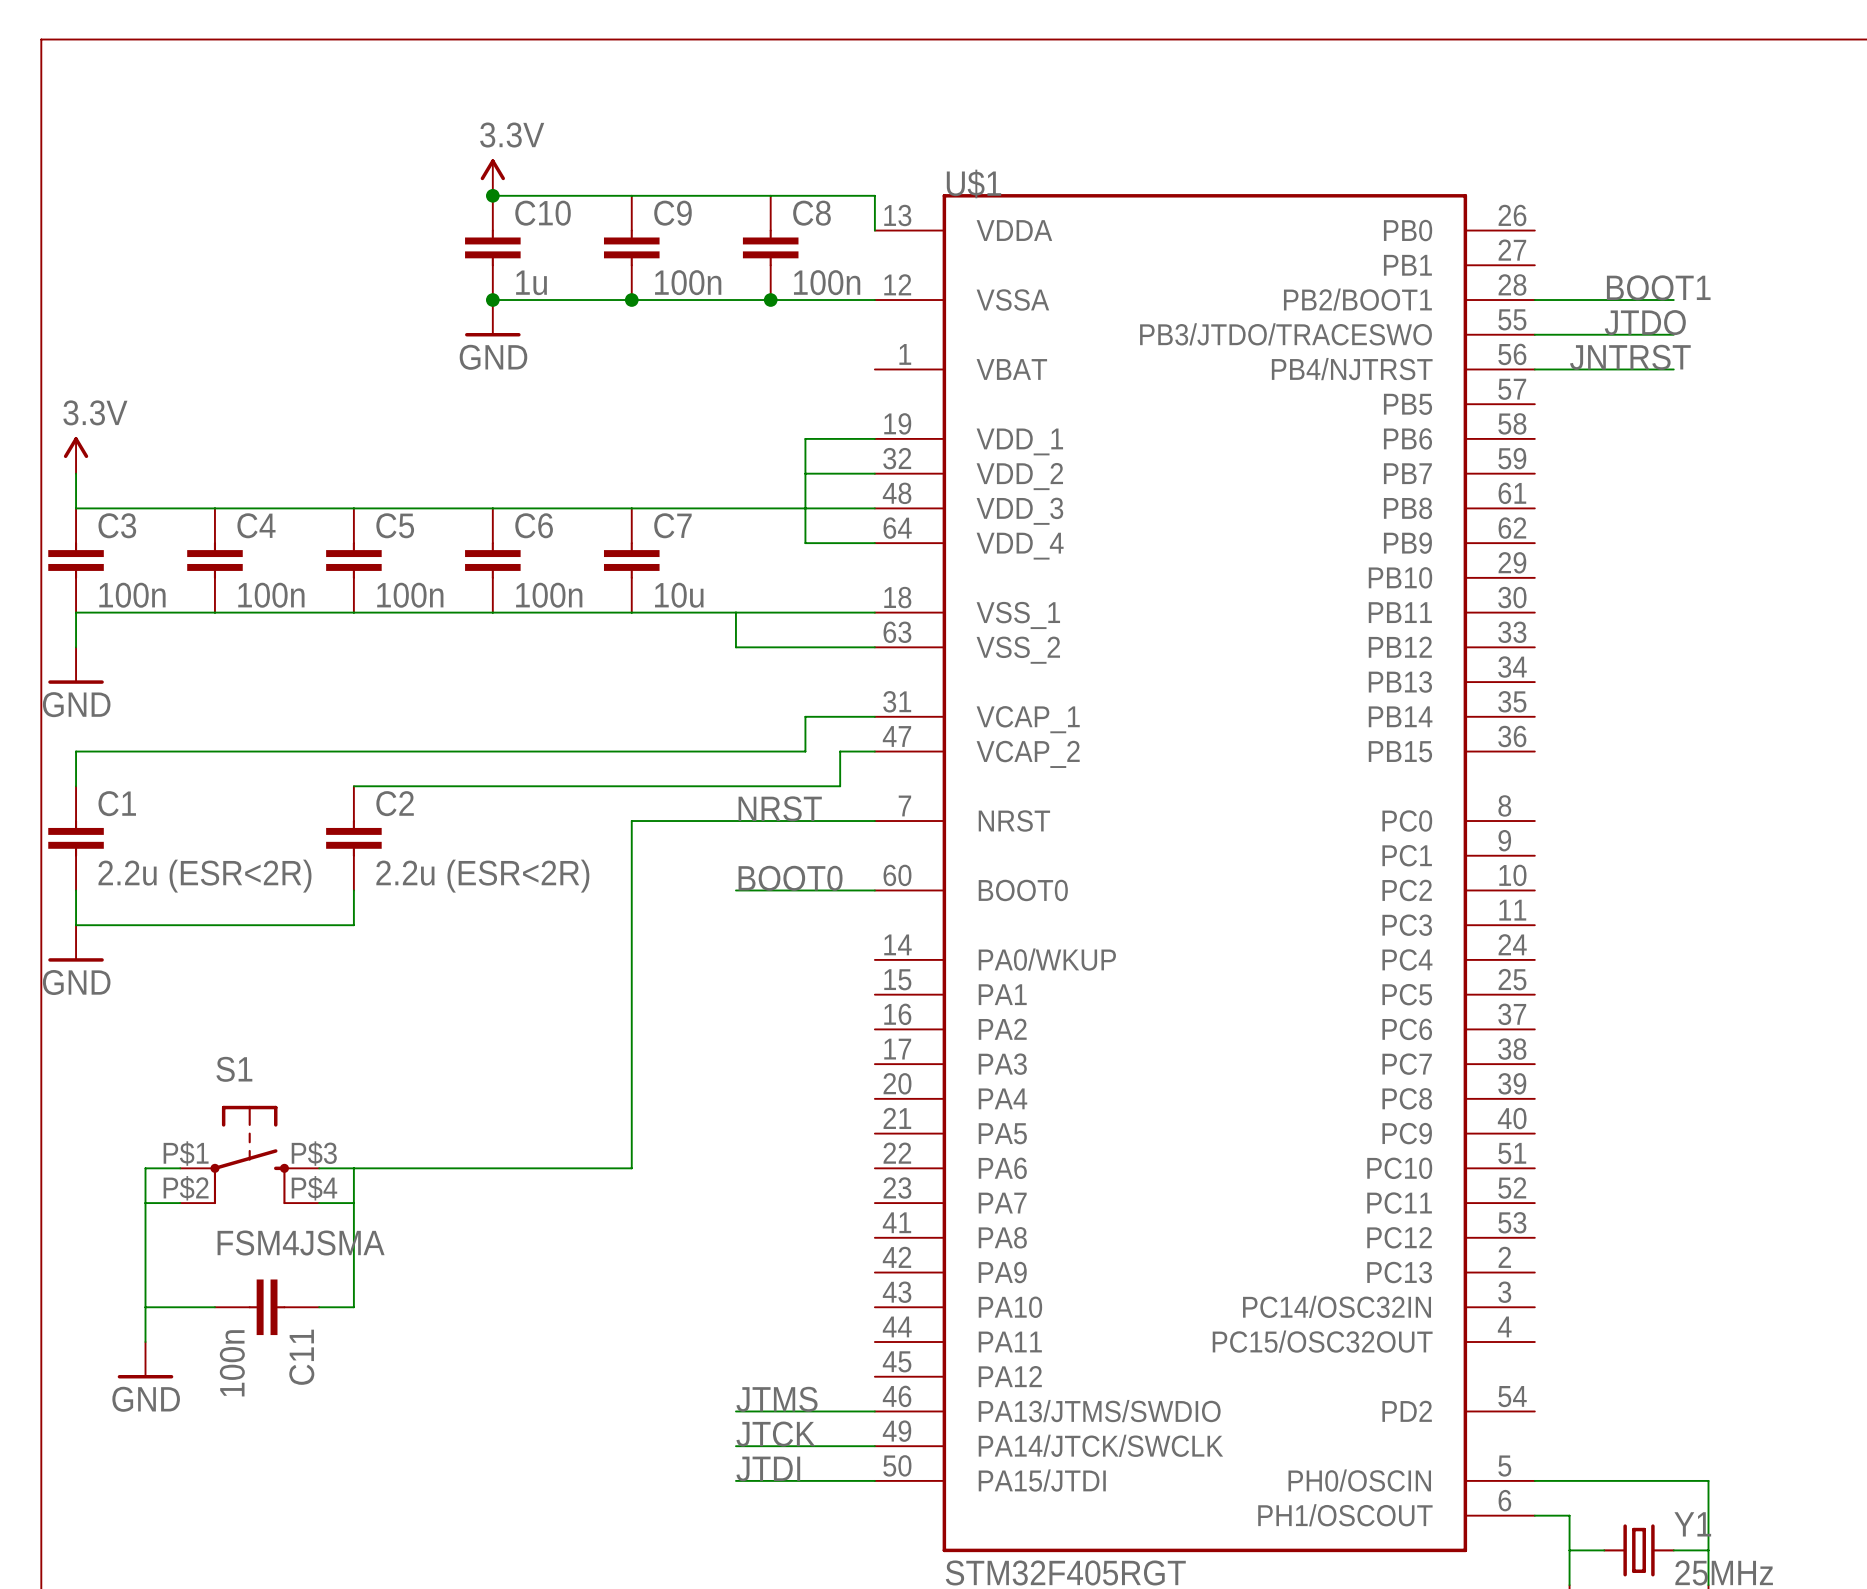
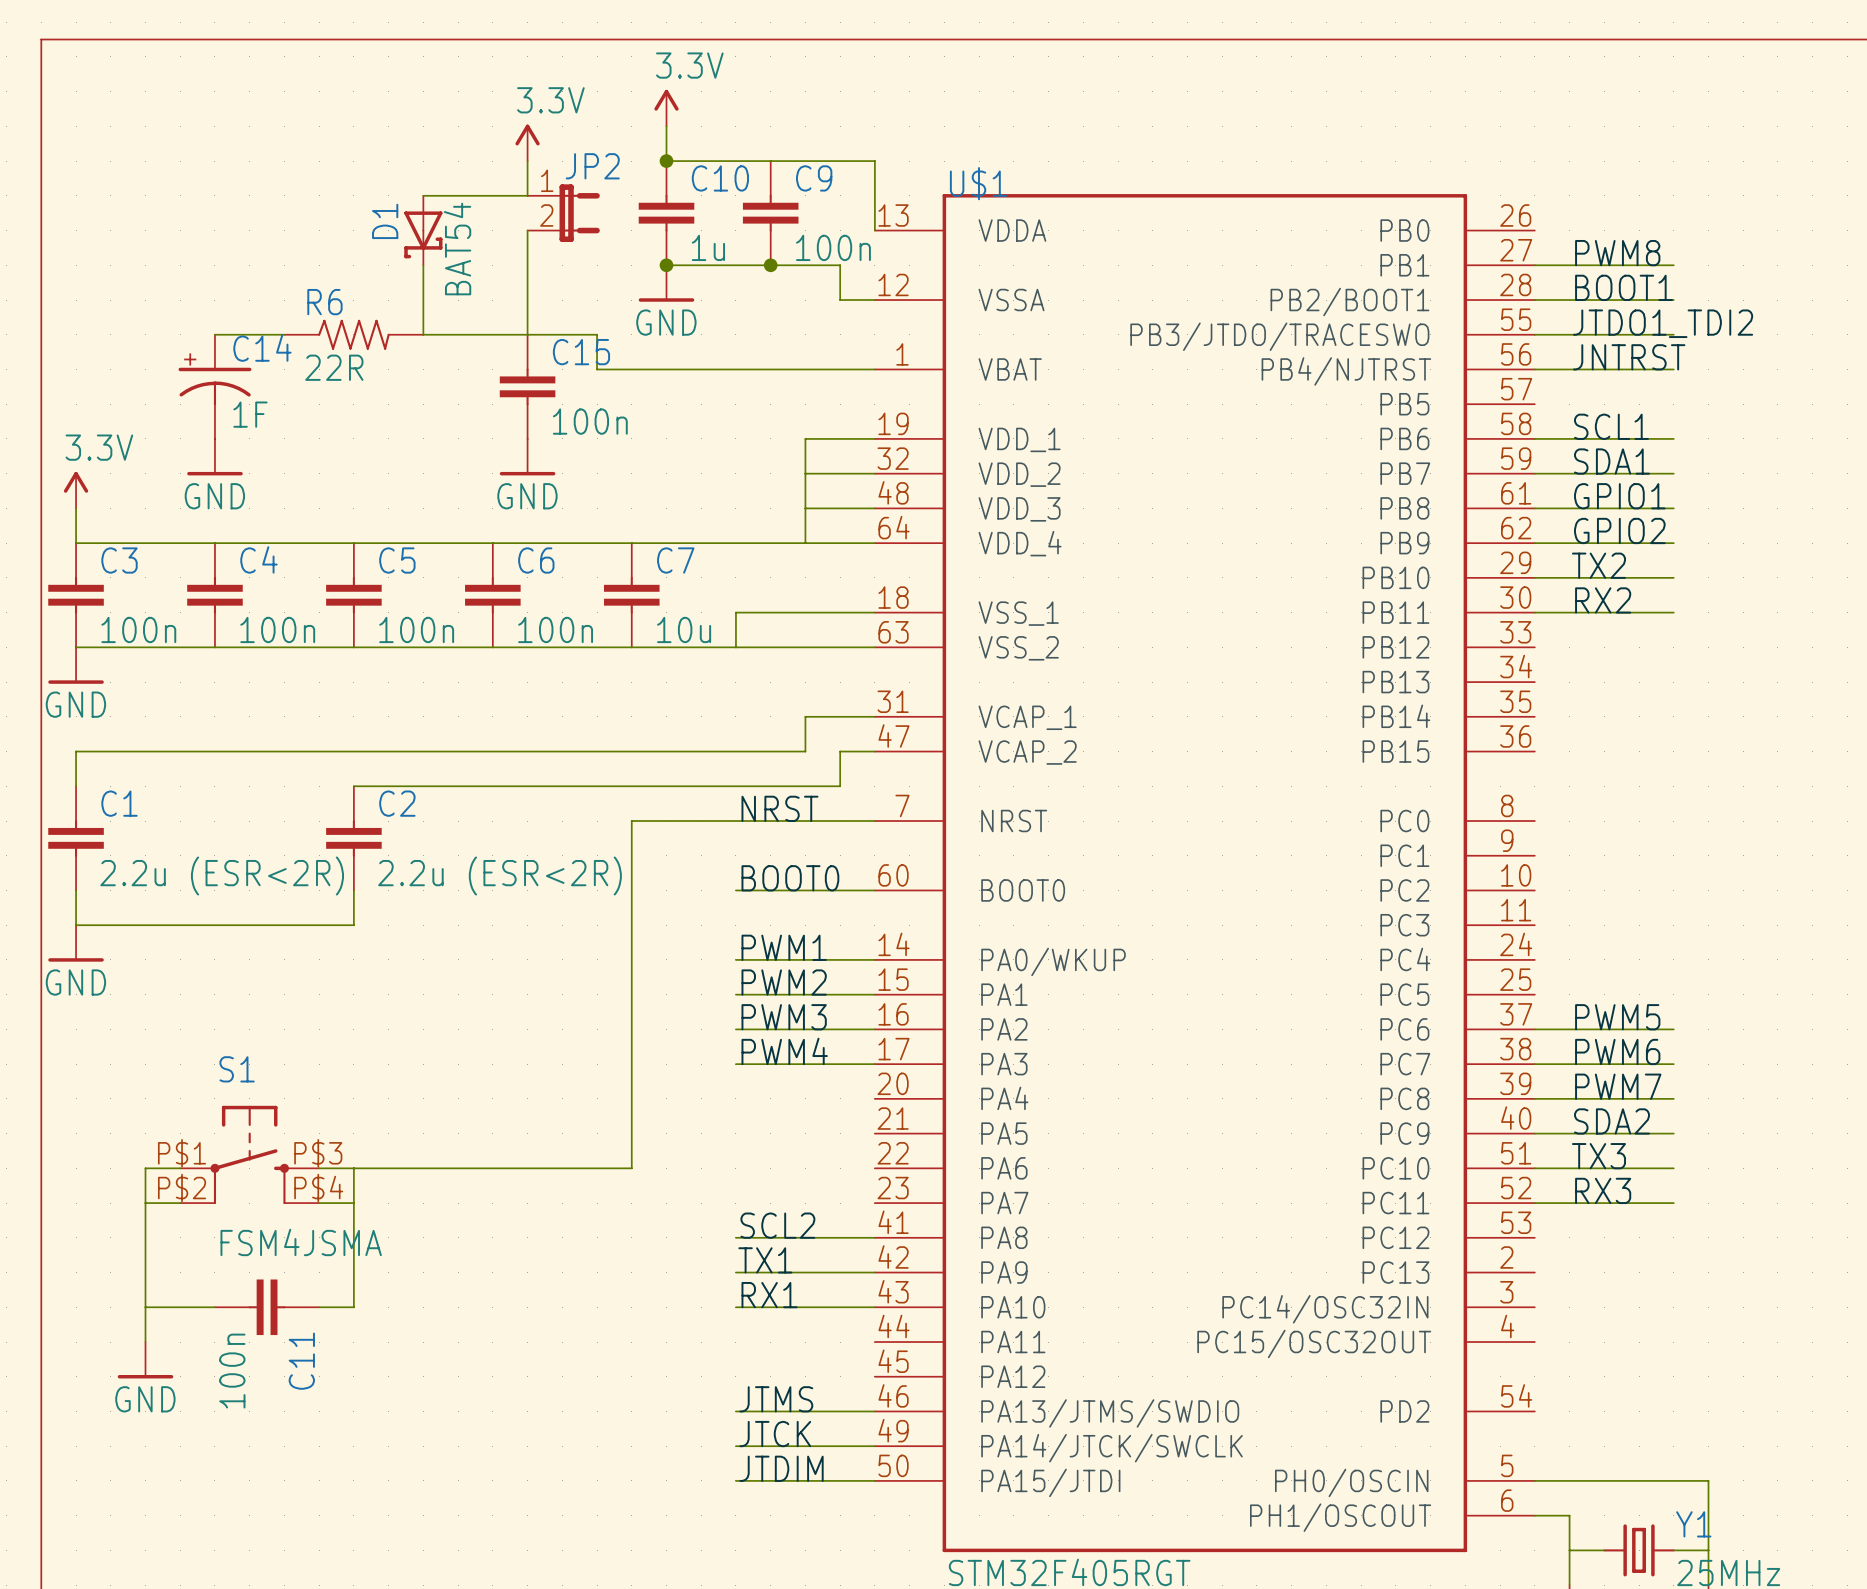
power symbol: none -> 3.3V (666, 108)
wire: none -> (527, 161) (527, 195)
junction: none -> (666, 161)
power symbol position: 3.3V (492, 177) -> 3.3V (527, 142)
wire: none -> (423, 195) (492, 195)
junction: (492, 195) -> none
wire: (527, 195) (874, 195) -> (666, 126) (666, 161) (874, 161) (874, 195)
JP2: none -> (563, 213)
D1: none -> BAT54 (423, 230)
wire: none -> (527, 230) (527, 334)
C10 position: (492, 247) -> (666, 213)
C9 position: (631, 247) -> (770, 213)
C8: 100n (770, 247) -> none
label: none -> PWM8 (1617, 253)
wire: none -> (423, 265) (423, 334) (597, 334) (597, 369) (874, 369)
wire: none -> (1534, 265) (1673, 265)
power symbol: none -> GND (666, 283)
label position: BOOT1 (1658, 287) -> BOOT1 (1623, 287)
wire: (492, 300) (840, 300) -> (666, 265) (840, 265) (840, 300)
junction: (492, 300) -> none
junction position: (631, 300) -> (666, 265)
junction position: (770, 300) -> (770, 265)
power symbol: GND (492, 318) -> none
label: JTDO (1645, 322) -> none
label: none -> JTDO1_TDI2 (1663, 323)
wire: none -> (214, 334) (284, 334)
R6: none -> 22R (353, 334)
C14: none -> 1F (214, 386)
C15: none -> 100n (527, 386)
label: none -> SCL1 (1611, 426)
wire: none -> (1534, 438) (1673, 438)
power symbol position: 3.3V (76, 455) -> 3.3V (76, 490)
power symbol: none -> GND (214, 457)
power symbol: none -> GND (527, 457)
label: none -> SDA1 (1612, 461)
wire: (76, 473) (76, 508) (805, 508) -> (76, 508) (76, 543) (805, 543)
wire: none -> (1534, 473) (1673, 473)
label: none -> GPIO1 (1619, 496)
wire: none -> (1534, 508) (1673, 508)
label: none -> GPIO2 (1619, 530)
wire: none -> (1534, 543) (1673, 543)
C3 position: (76, 560) -> (76, 595)
C4 position: (214, 560) -> (214, 595)
C5 position: (353, 560) -> (353, 595)
C6 position: (492, 560) -> (492, 595)
C7 position: (631, 560) -> (631, 595)
label: none -> TX2 (1598, 565)
wire: none -> (1534, 577) (1673, 577)
label: none -> RX2 (1603, 600)
wire: (735, 612) (76, 612) (76, 647) -> (735, 647) (76, 647)
wire: none -> (1534, 612) (1673, 612)
label: none -> PWM1 (784, 947)
wire: none -> (735, 959) (874, 959)
label: none -> PWM2 (784, 982)
wire: none -> (735, 994) (874, 994)
label: none -> PWM3 (784, 1017)
label: none -> PWM5 (1617, 1017)
wire: none -> (735, 1029) (874, 1029)
wire: none -> (1534, 1029) (1673, 1029)
label: none -> PWM4 (784, 1051)
label: none -> PWM6 (1617, 1051)
wire: none -> (735, 1064) (874, 1064)
wire: none -> (1534, 1064) (1673, 1064)
label: none -> PWM7 (1618, 1086)
wire: none -> (1534, 1098) (1673, 1098)
label: none -> SDA2 (1612, 1121)
wire: none -> (1534, 1133) (1673, 1133)
label: none -> TX3 (1598, 1156)
wire: none -> (1534, 1168) (1673, 1168)
label: none -> RX3 (1603, 1190)
wire: none -> (1534, 1203) (1673, 1203)
label: none -> SCL2 (777, 1225)
wire: none -> (735, 1237) (874, 1237)
label: none -> TX1 (765, 1260)
wire: none -> (735, 1272) (874, 1272)
label: none -> RX1 (769, 1295)
wire: none -> (735, 1307) (874, 1307)
label: JTDI (768, 1468) -> JTDIM (781, 1468)

